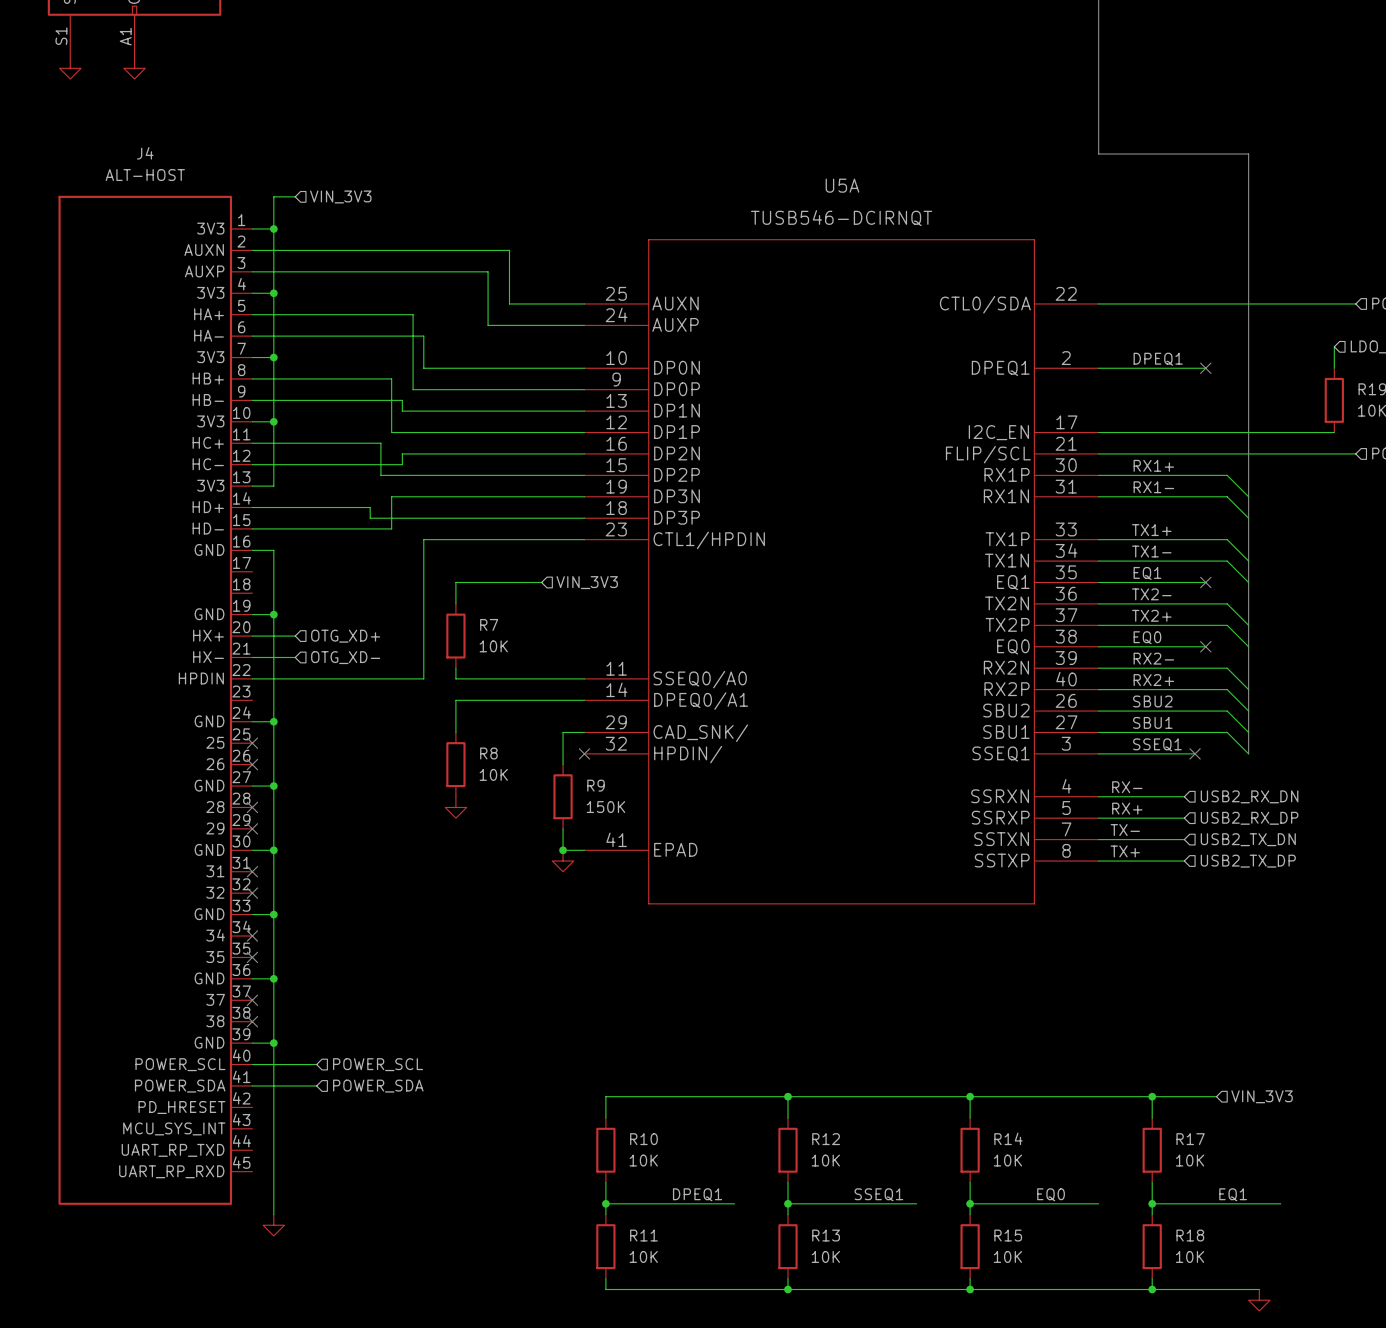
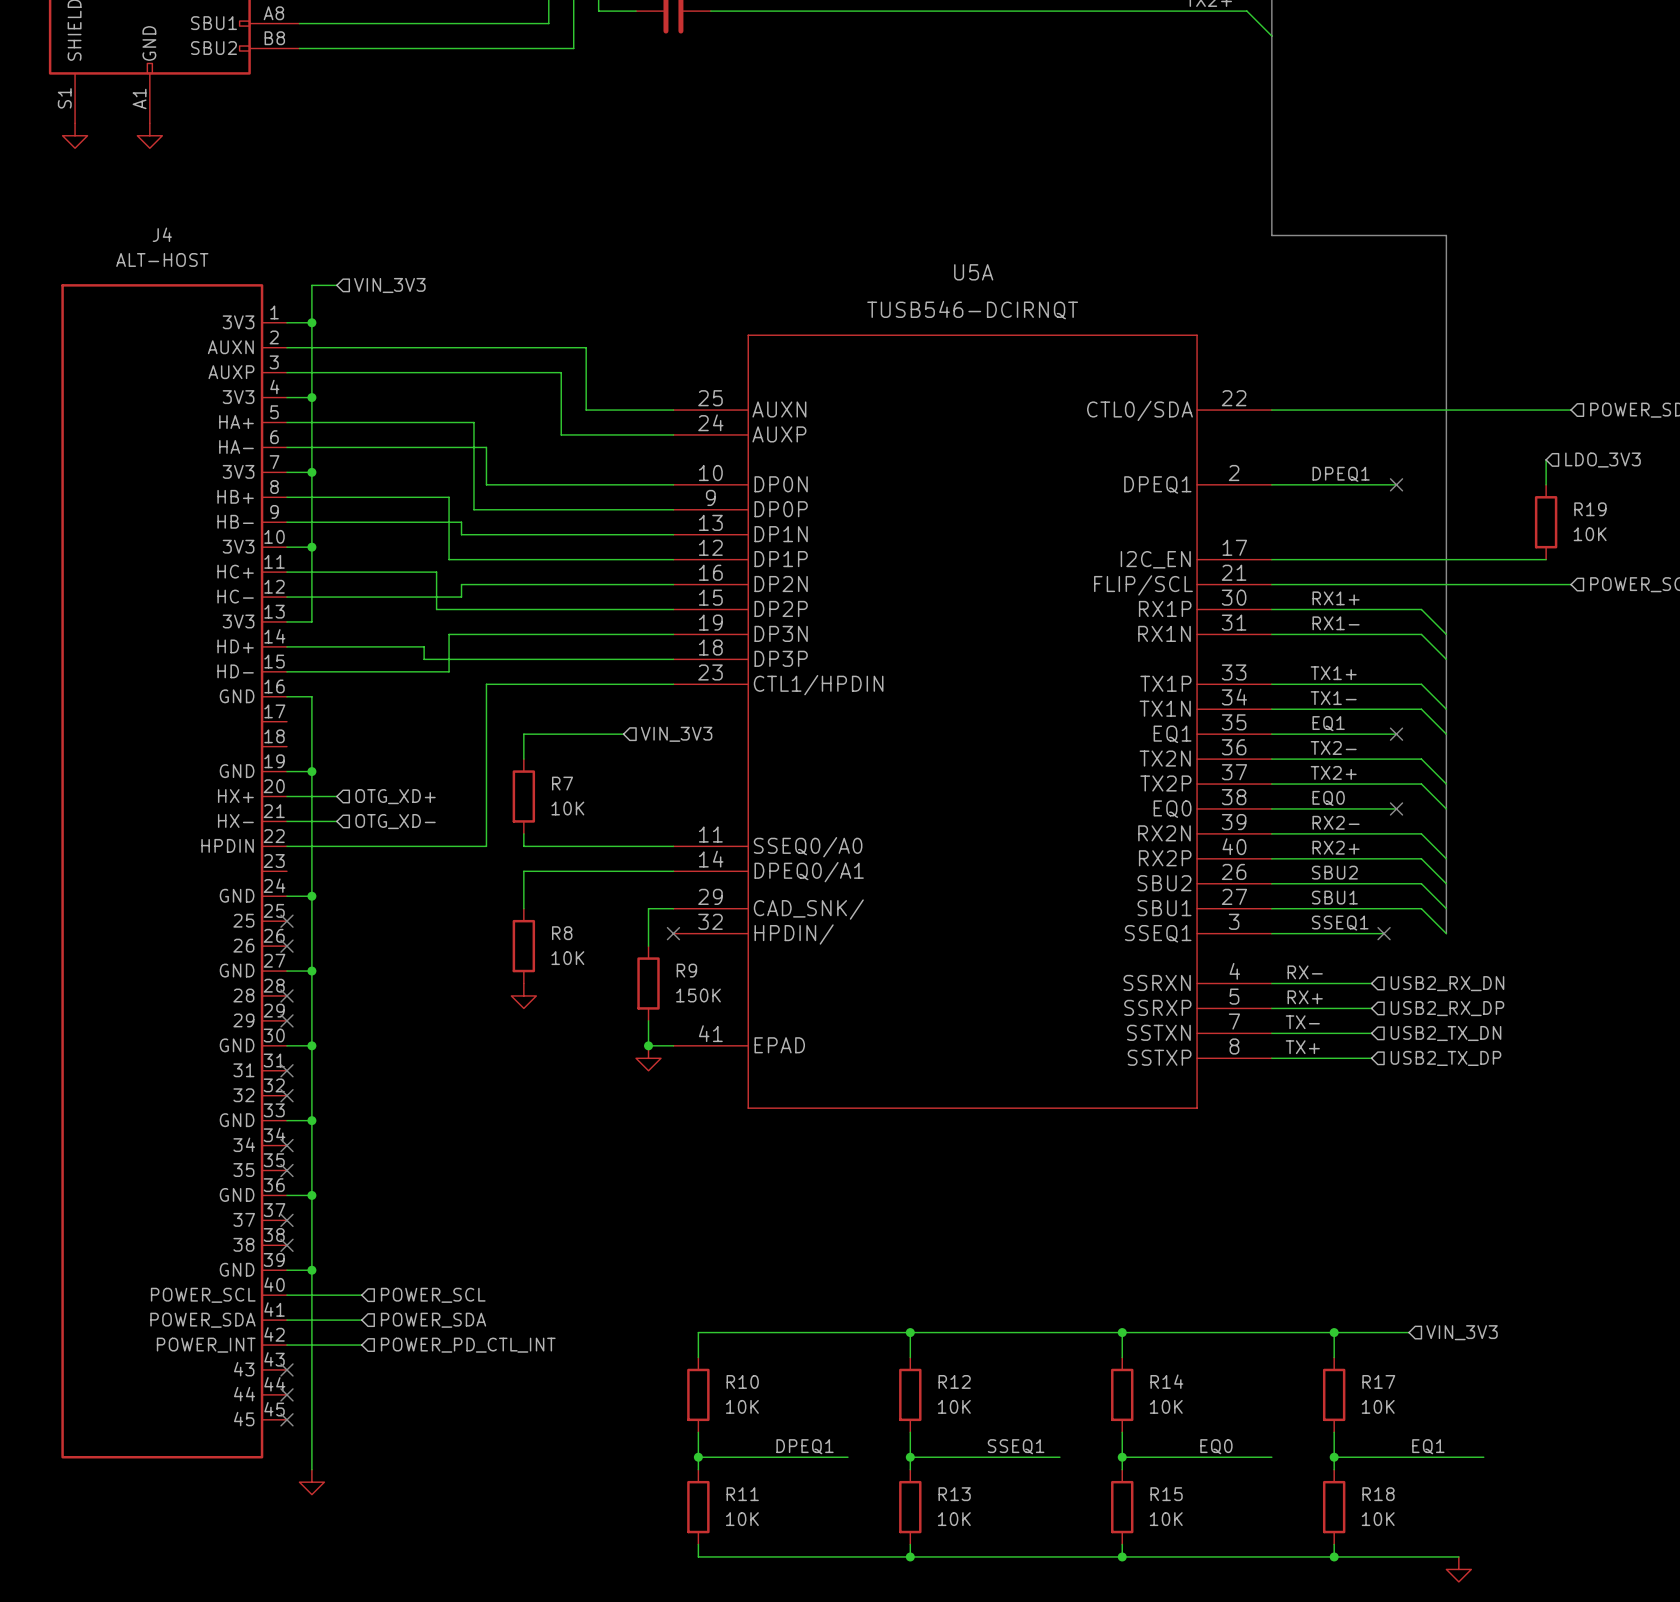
J4 pin name: PD_HRESET (181, 1107) -> POWER_INT (206, 1345)
wire: none -> (286, 1345) (361, 1345)
hierarchical label: none -> POWER_PD_CTL_INT (468, 1345)
J4 pin name: MCU_SYS_INT (174, 1128) -> 43 (244, 1369)
no-connect mark: none -> (286, 1369)
J4 pin name: UART_RP_TXD (173, 1150) -> 44 (244, 1394)
no-connect mark: none -> (286, 1394)
J4 pin name: UART_RP_RXD (171, 1171) -> 45 (244, 1419)
no-connect mark: none -> (286, 1419)

